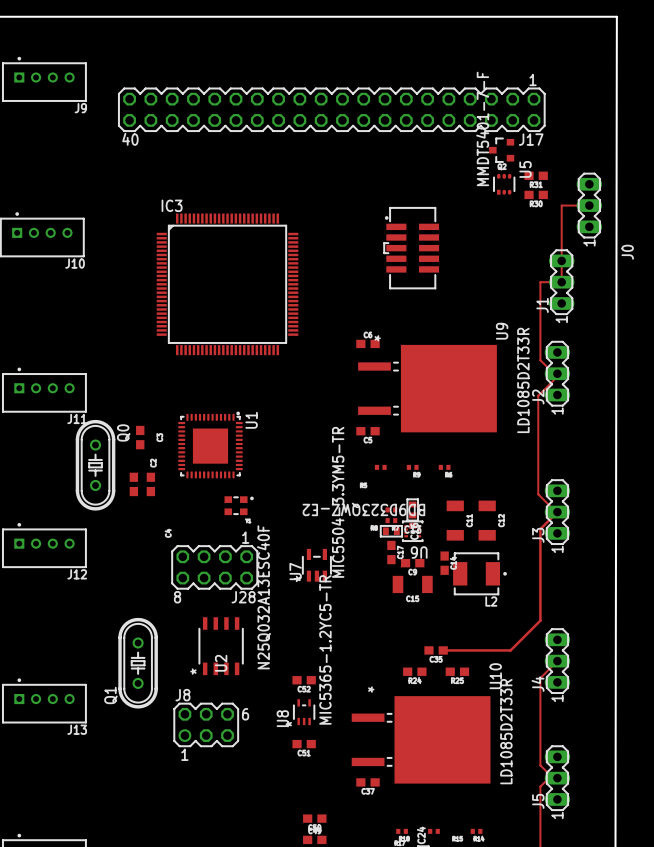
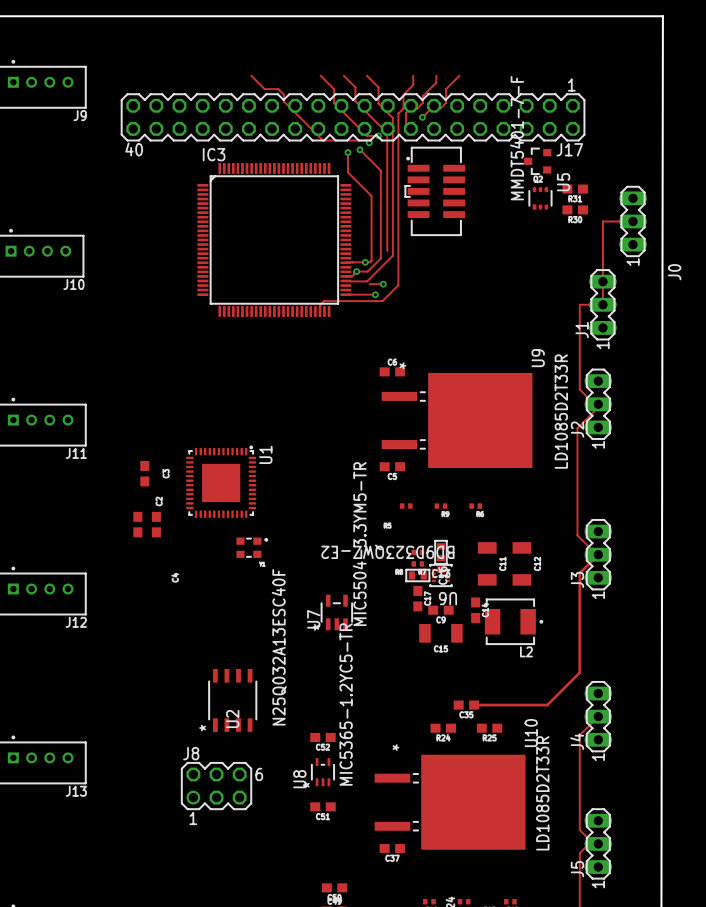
track: none -> (251, 75) (264, 89) (278, 89) (284, 94) (284, 101) (322, 140) (366, 140) (369, 142)
track: none -> (320, 75) (334, 89) (334, 102) (367, 135) (378, 135)
track: none -> (343, 75) (355, 87) (355, 101) (387, 133) (387, 251)
track: none -> (366, 75) (378, 87) (378, 103) (392, 117) (392, 255) (367, 281) (350, 281)
track: none -> (413, 75) (413, 85) (403, 94) (403, 108) (398, 113) (398, 285) (382, 301) (324, 301) (320, 307)
track: none -> (436, 75) (436, 82) (422, 96) (422, 102) (417, 108) (410, 108) (406, 112) (406, 131)
track: none -> (459, 75) (446, 89) (446, 102) (440, 108) (431, 108) (422, 117)
via: none -> (422, 117)
via: none -> (378, 135)
via: none -> (369, 142)
track: none -> (359, 149) (380, 170) (380, 258) (367, 271) (354, 271) (352, 276) (345, 276)
via: none -> (359, 149)
track: none -> (348, 152) (348, 172) (371, 196) (371, 260) (345, 262)
via: none -> (348, 152)
via: none -> (365, 262)
part position: (411, 248) -> (434, 191)
via: none -> (356, 271)
track: none -> (369, 284) (383, 284)
via: none -> (383, 284)
track: none -> (345, 294) (375, 294)
via: none -> (375, 294)
IC3 position: (227, 284) -> (274, 239)
Q0: (95, 465) -> none
J28: (214, 567) -> none
Q1: (138, 663) -> none

